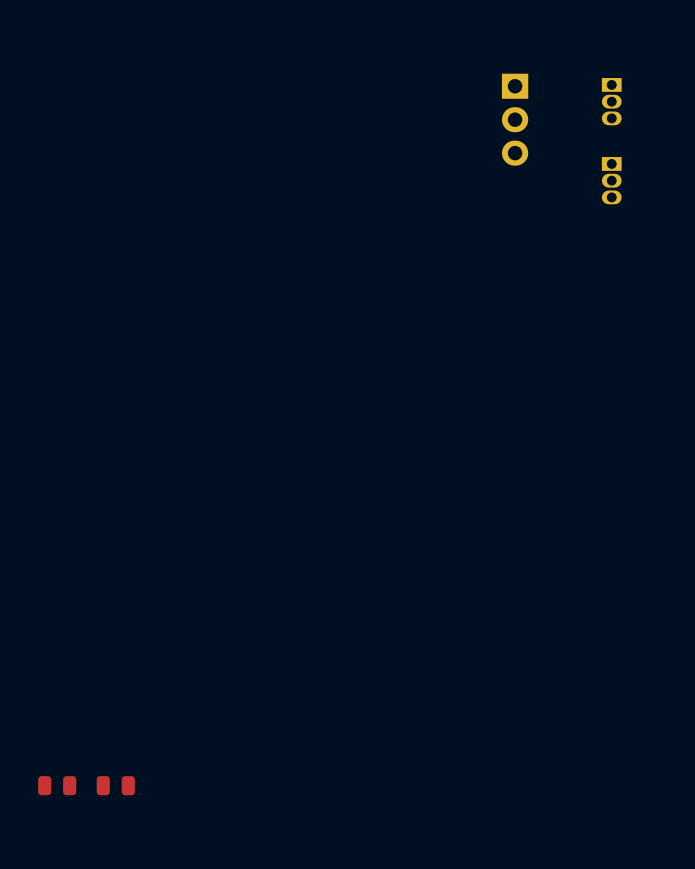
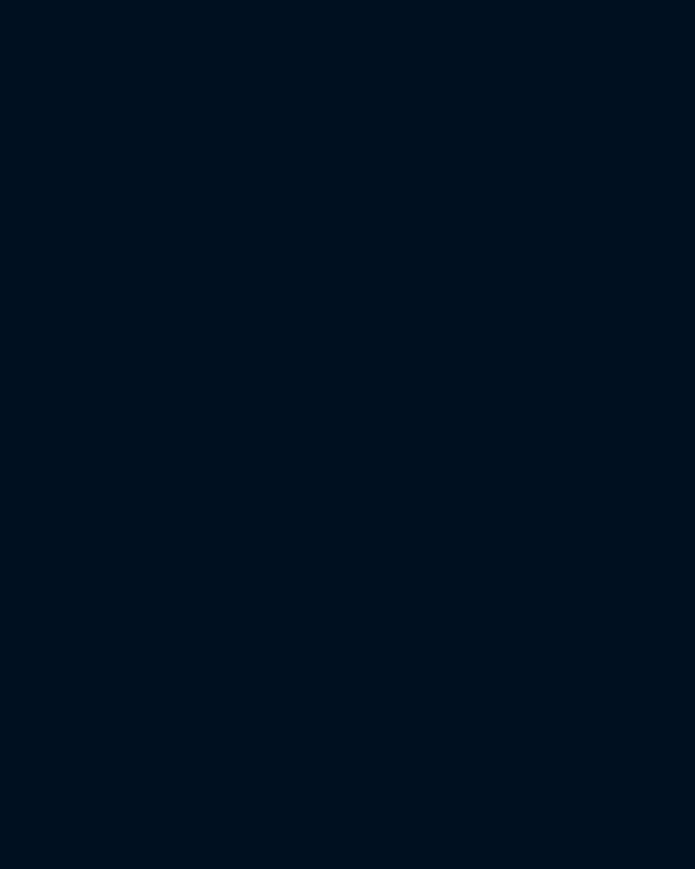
part: (611, 101) -> none
part: (515, 119) -> none
part: (611, 180) -> none
part: (57, 785) -> none
part: (115, 785) -> none

